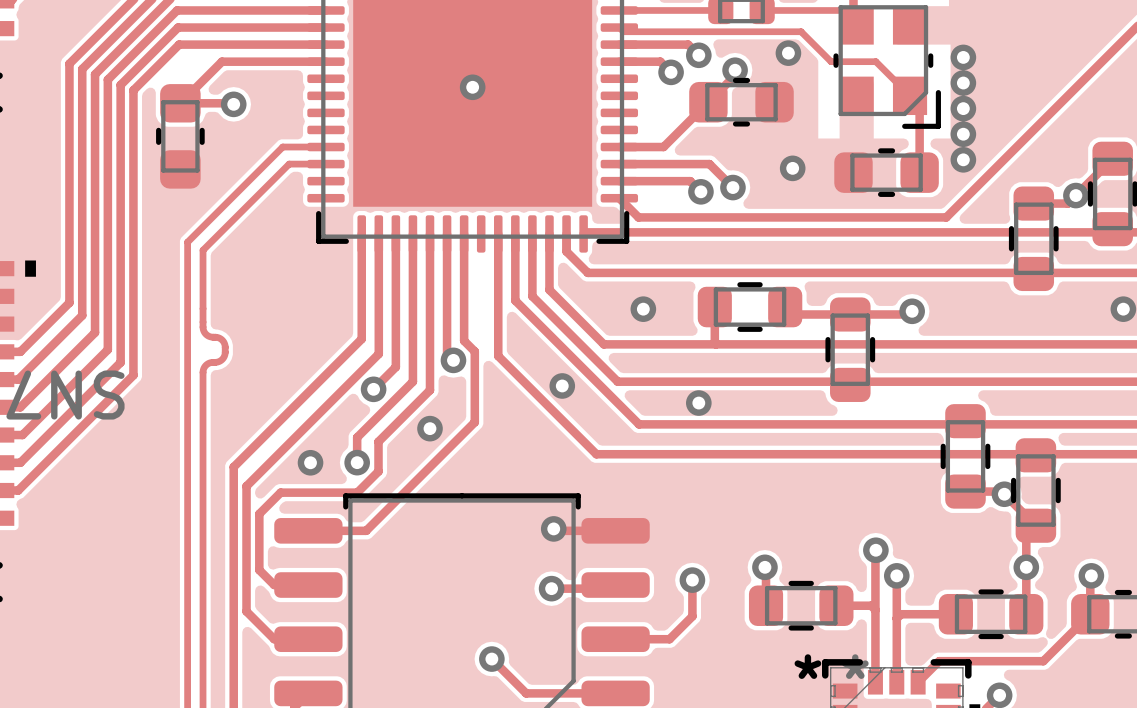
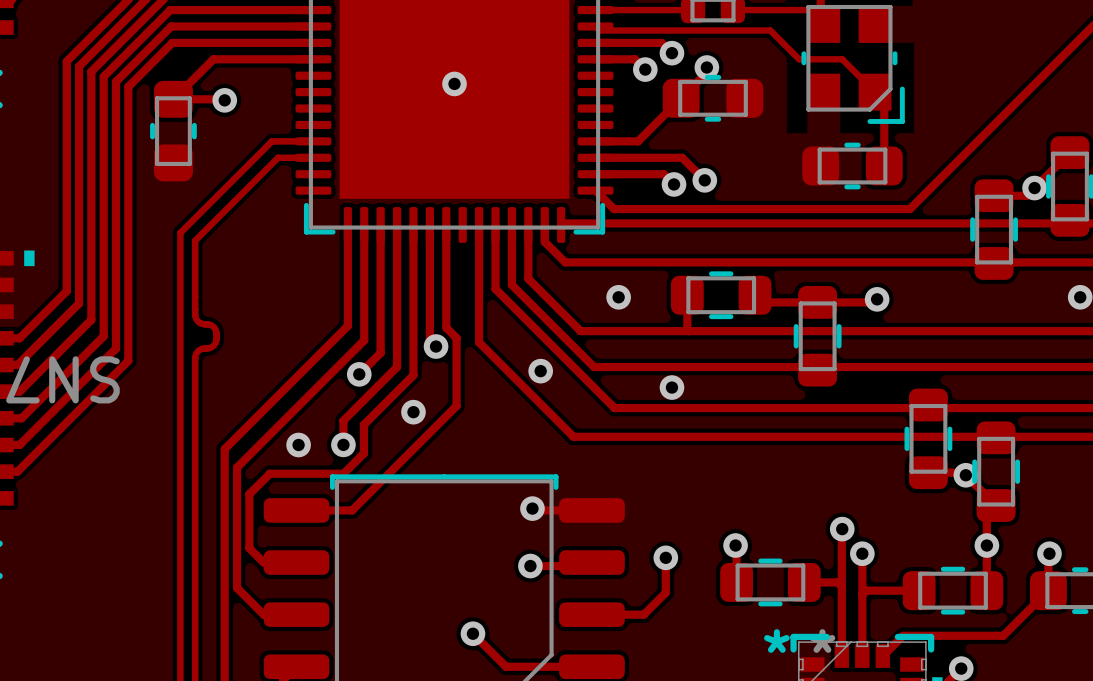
via: (788, 53) -> none
via: (963, 57) -> none
via: (963, 83) -> none
via: (963, 108) -> none
via: (963, 134) -> none
via: (963, 159) -> none
via: (792, 168) -> none

